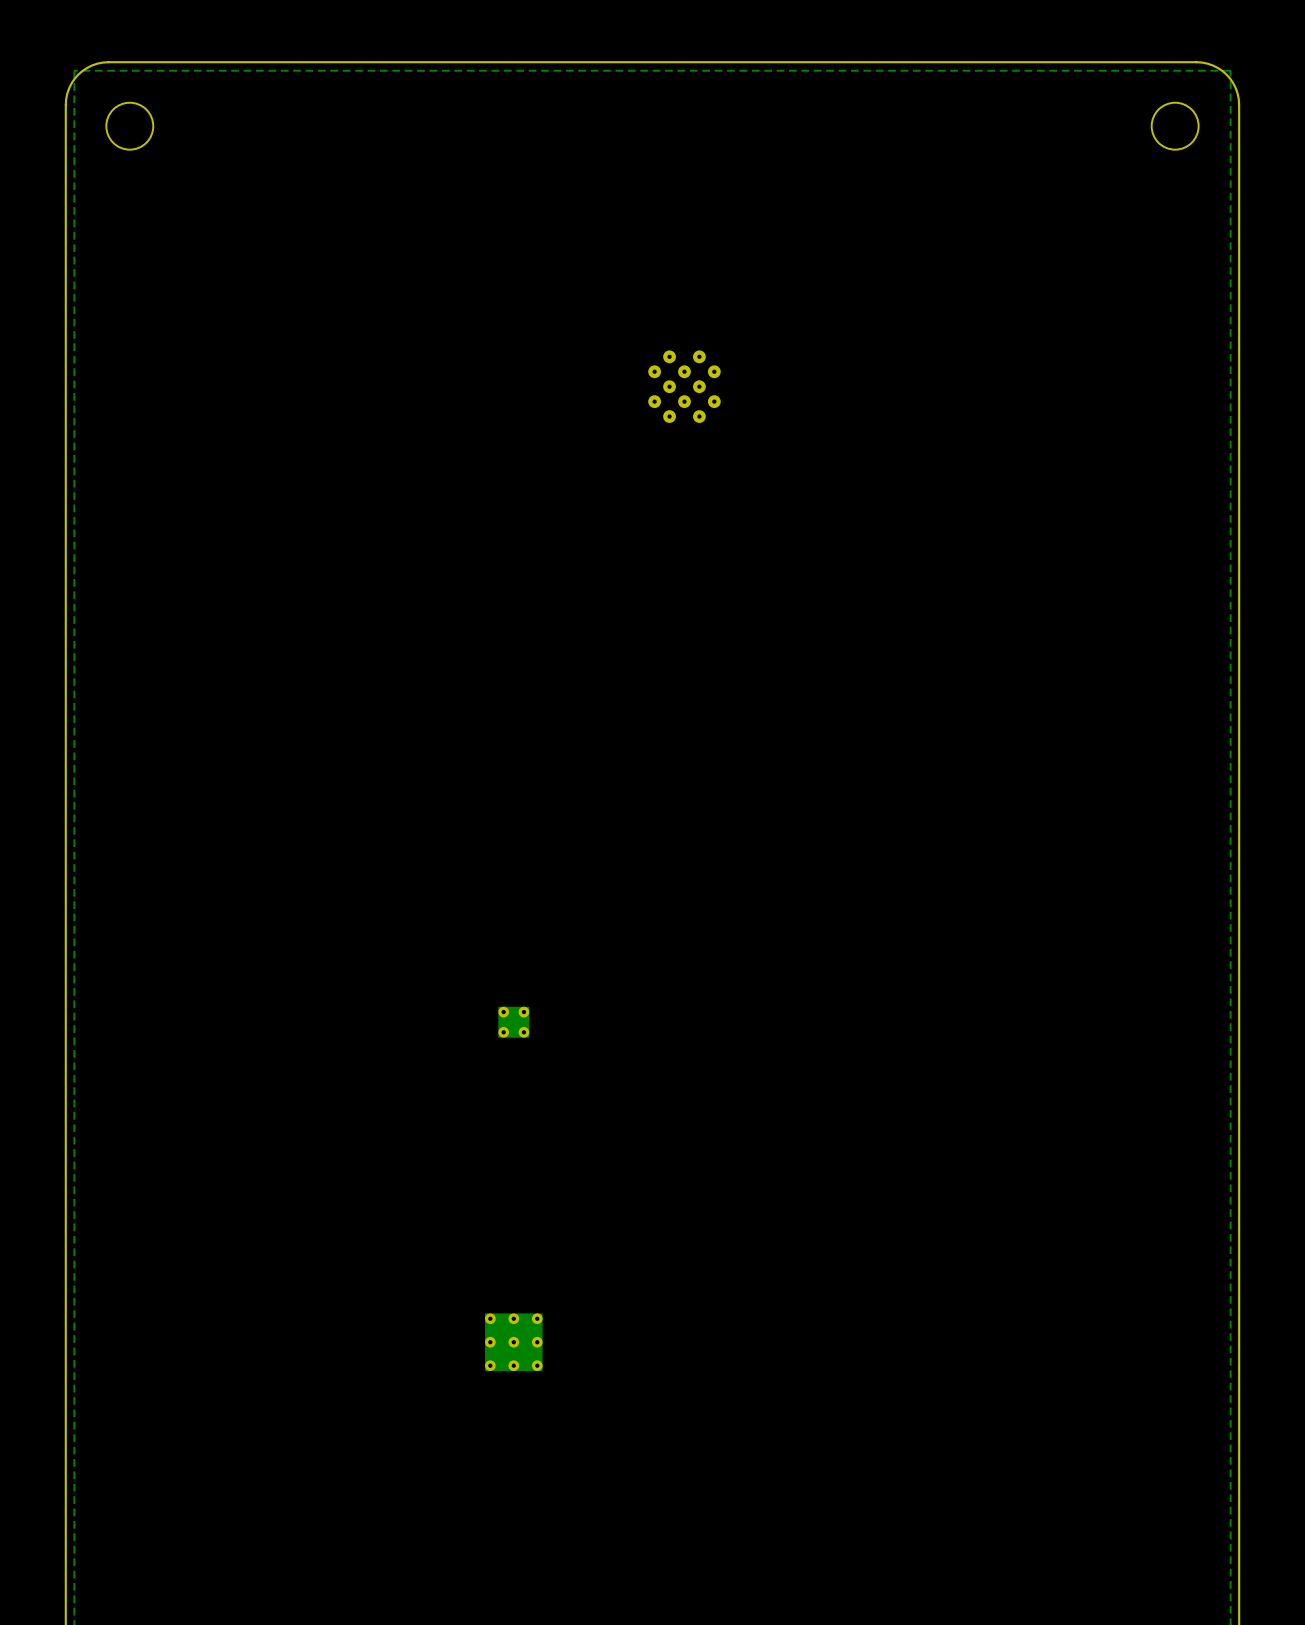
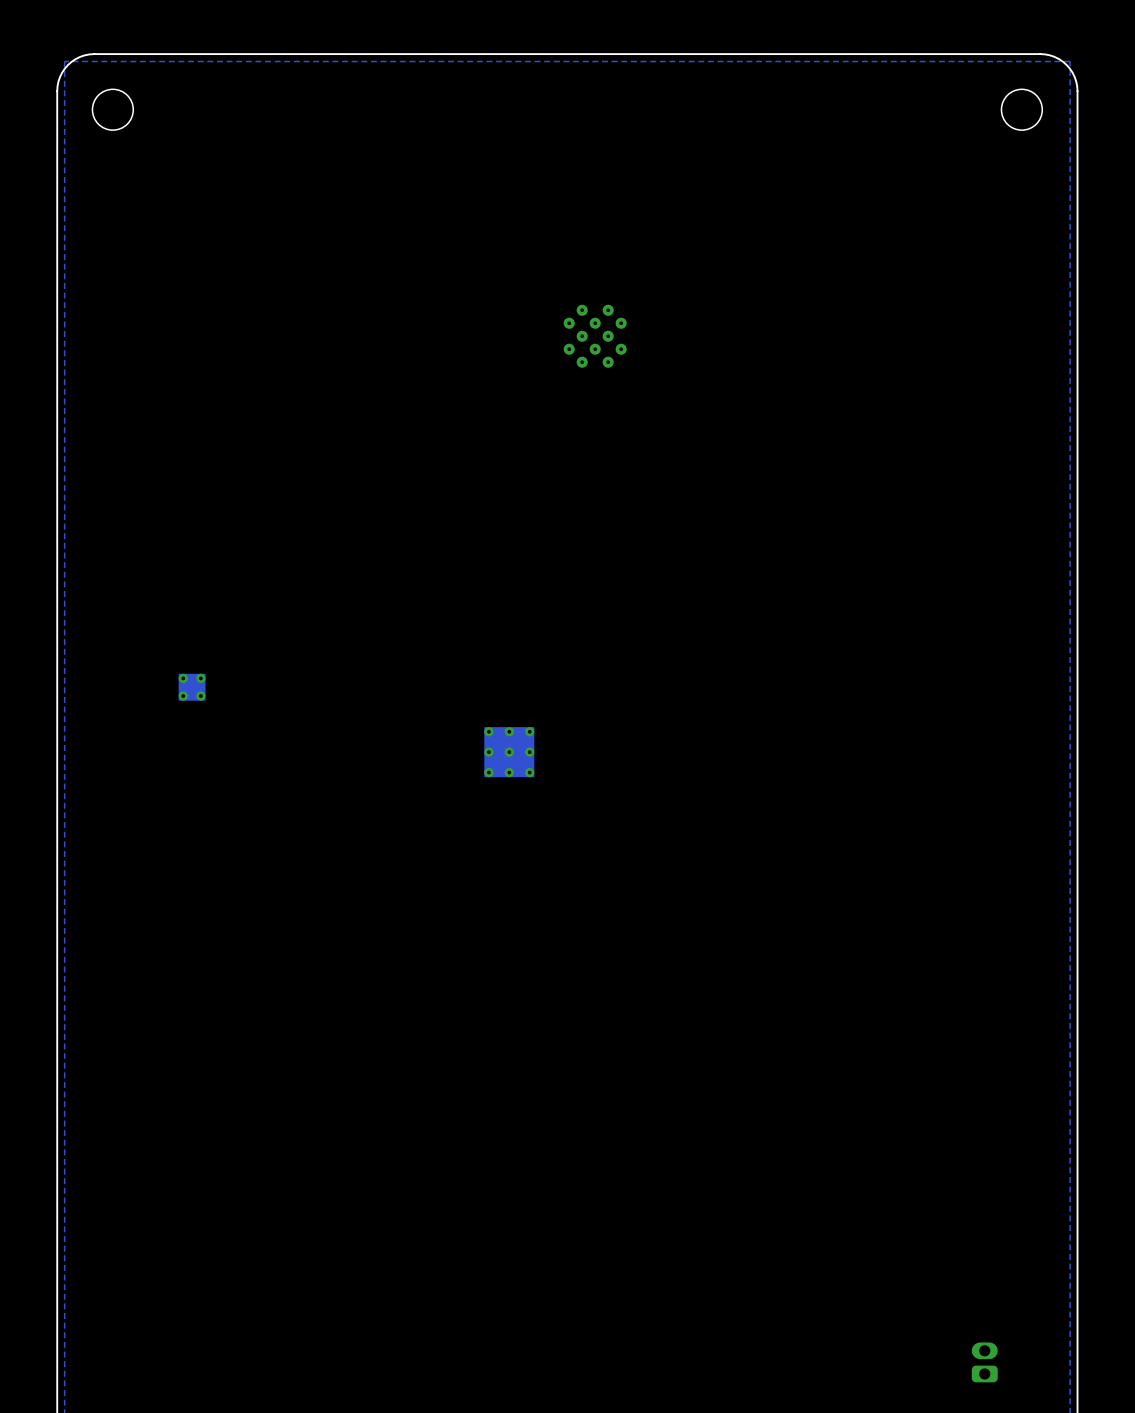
part position: (513, 1022) -> (192, 687)
part position: (513, 1342) -> (509, 752)
part: none -> (984, 1362)

